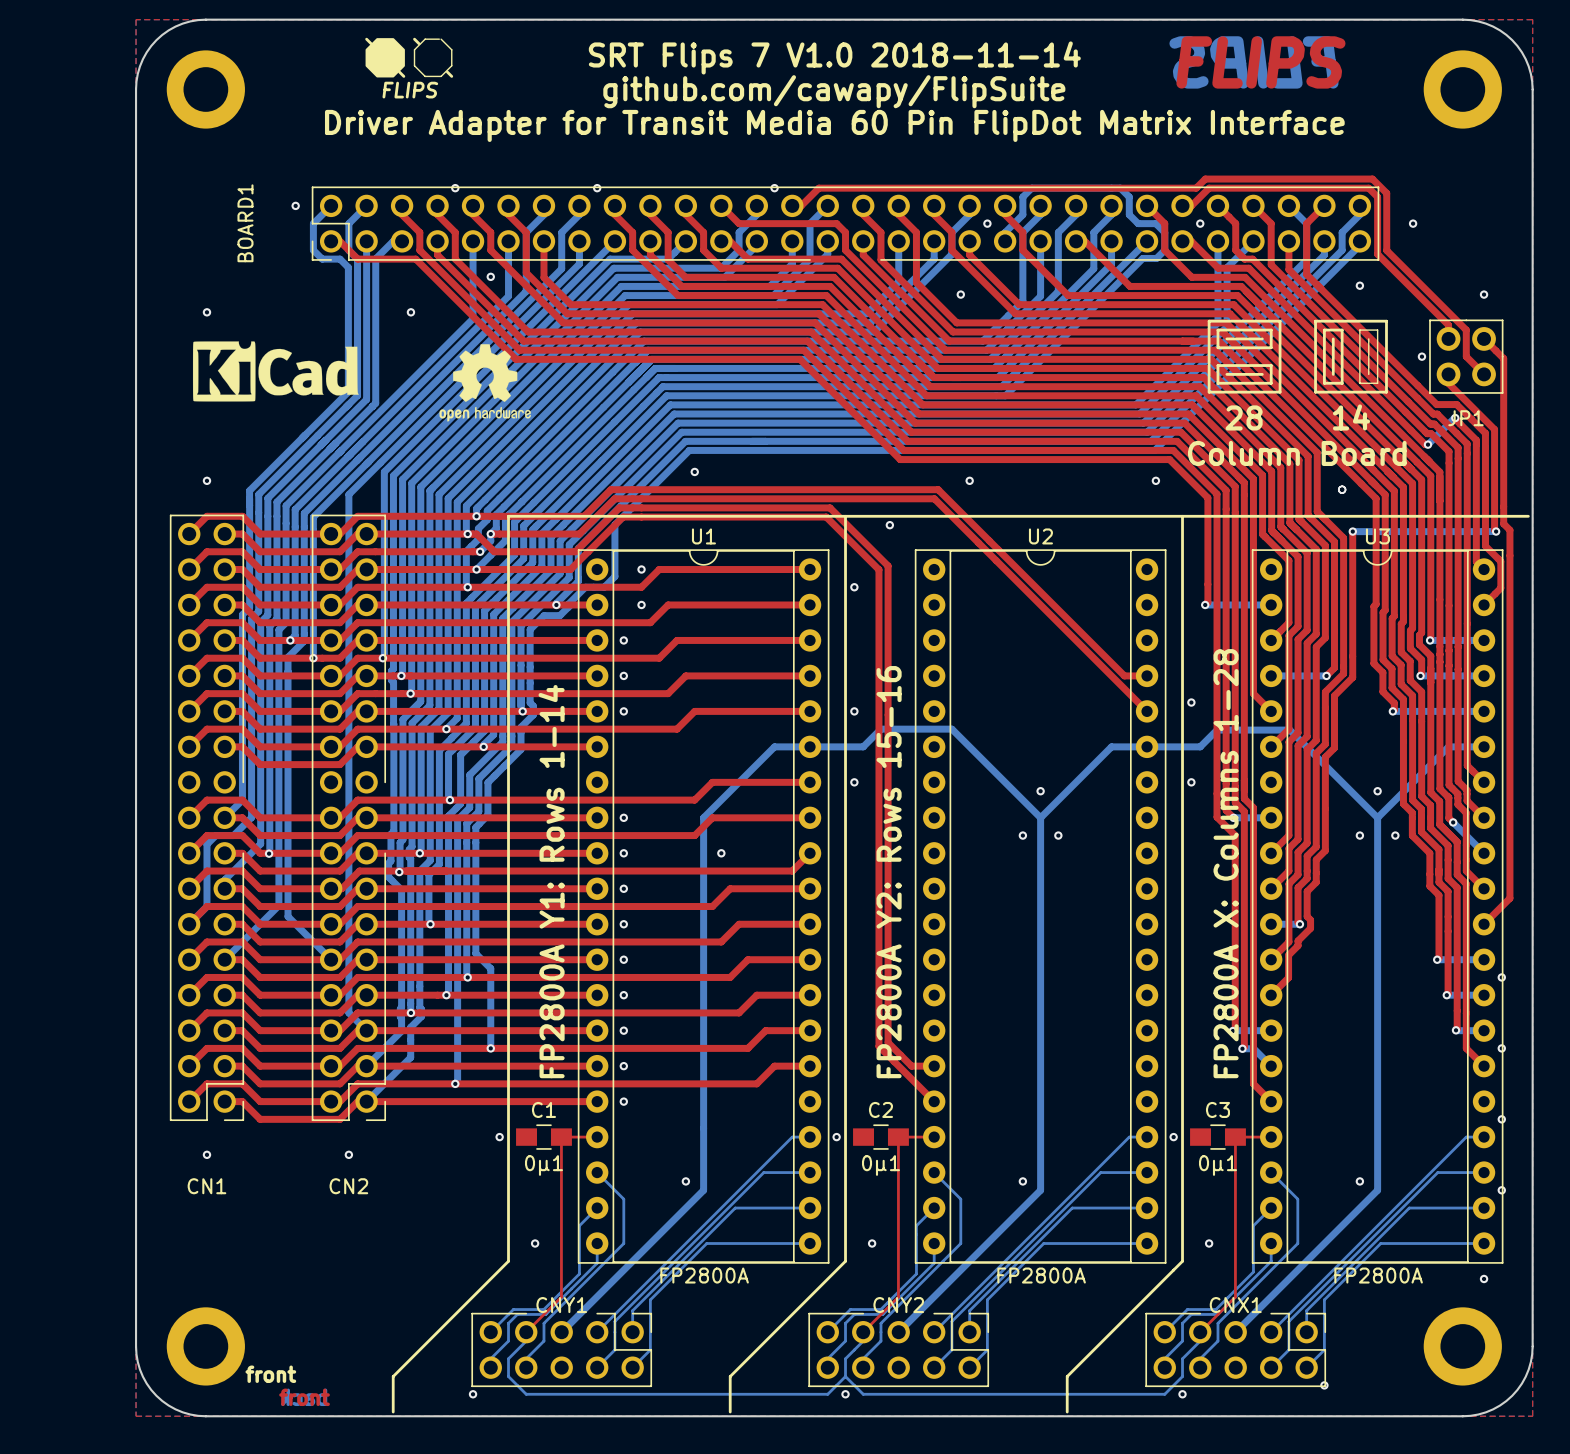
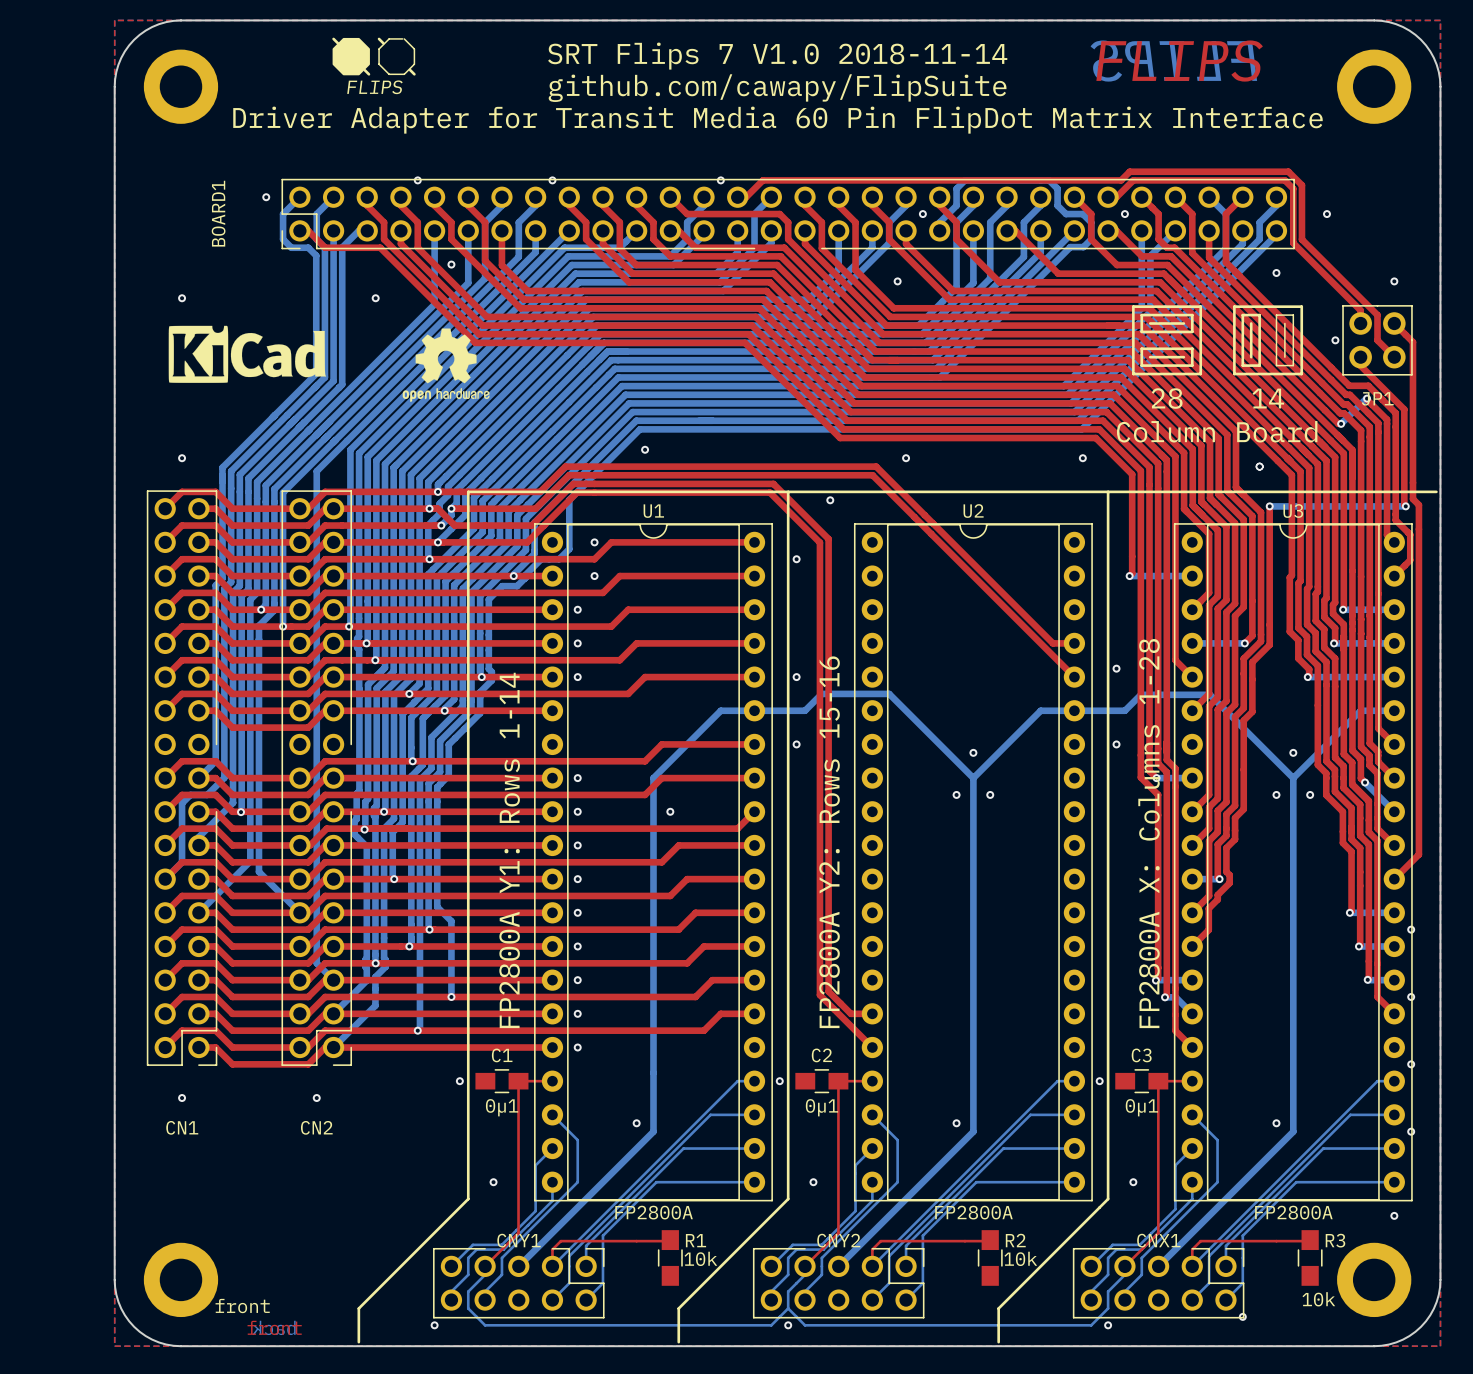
top track: none -> (670, 1240) (560, 1241) (552, 1249) (552, 1266)
top track: none -> (990, 1240) (880, 1241) (872, 1249) (872, 1266)
top track: none -> (1310, 1240) (1200, 1241) (1192, 1249) (1192, 1266)
R1: none -> 10k (670, 1257)
R2: none -> 10k (990, 1257)
R3: none -> 10k (1310, 1257)

